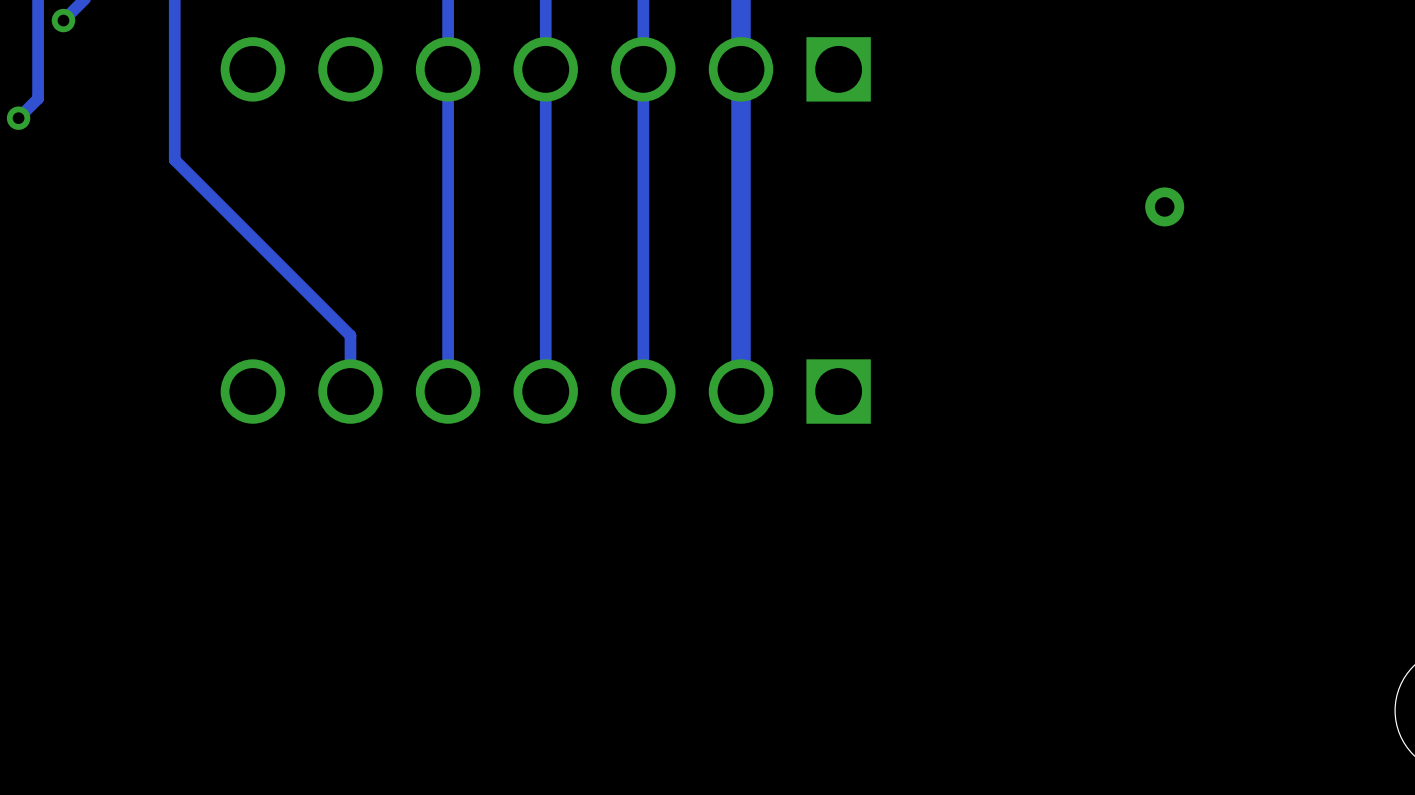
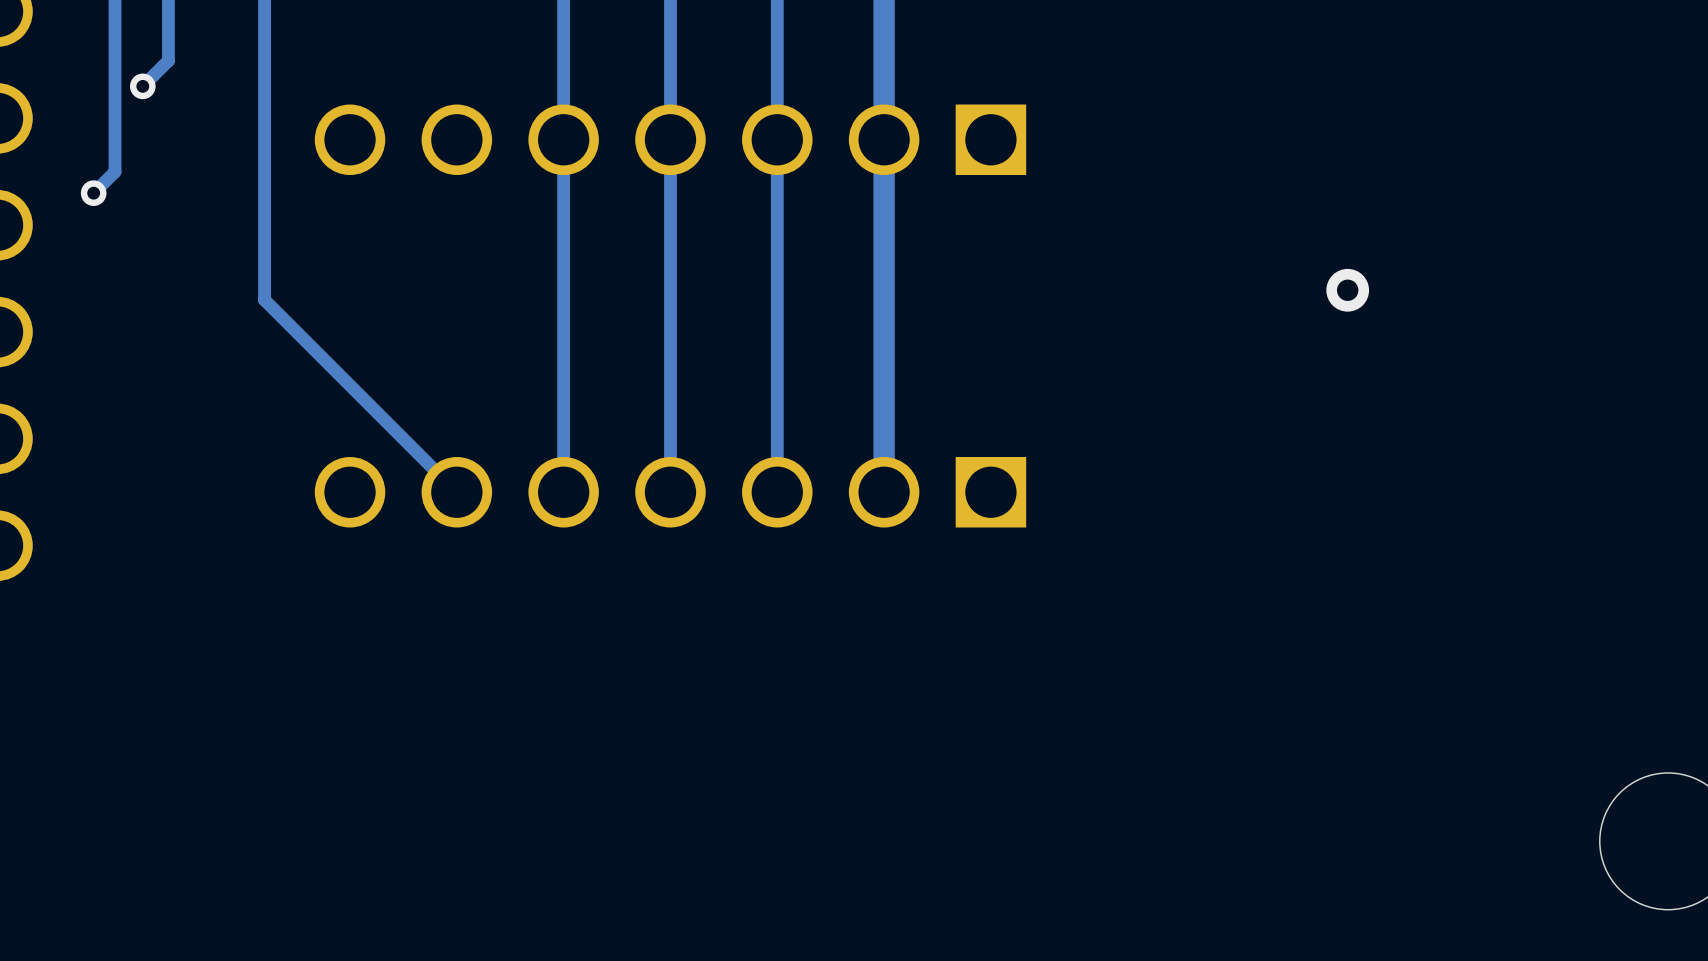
track: (174, 159) (350, 335) (350, 391) -> (264, 238) (264, 299) (456, 492)

